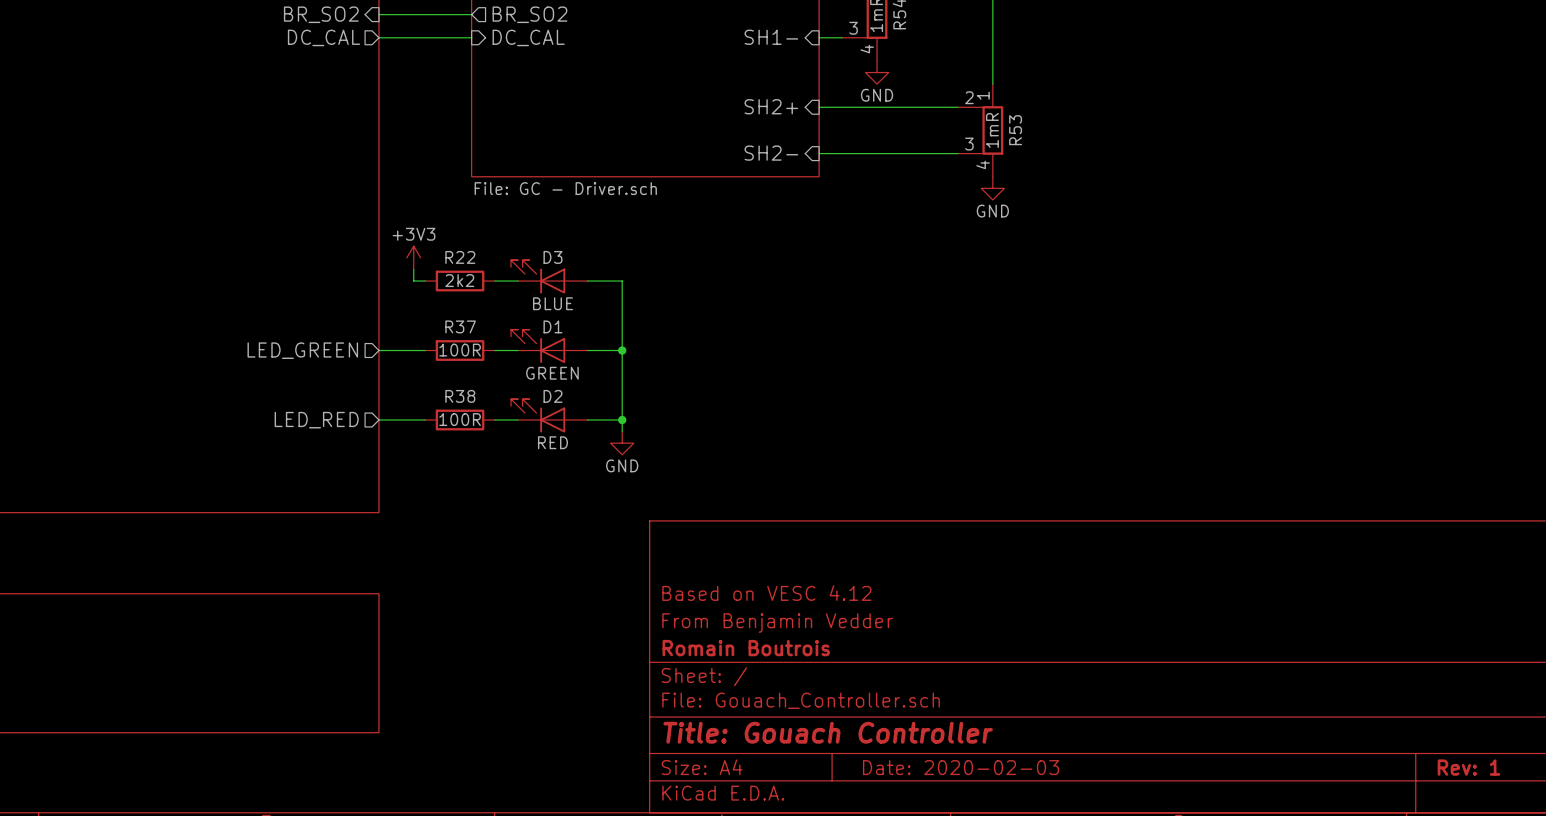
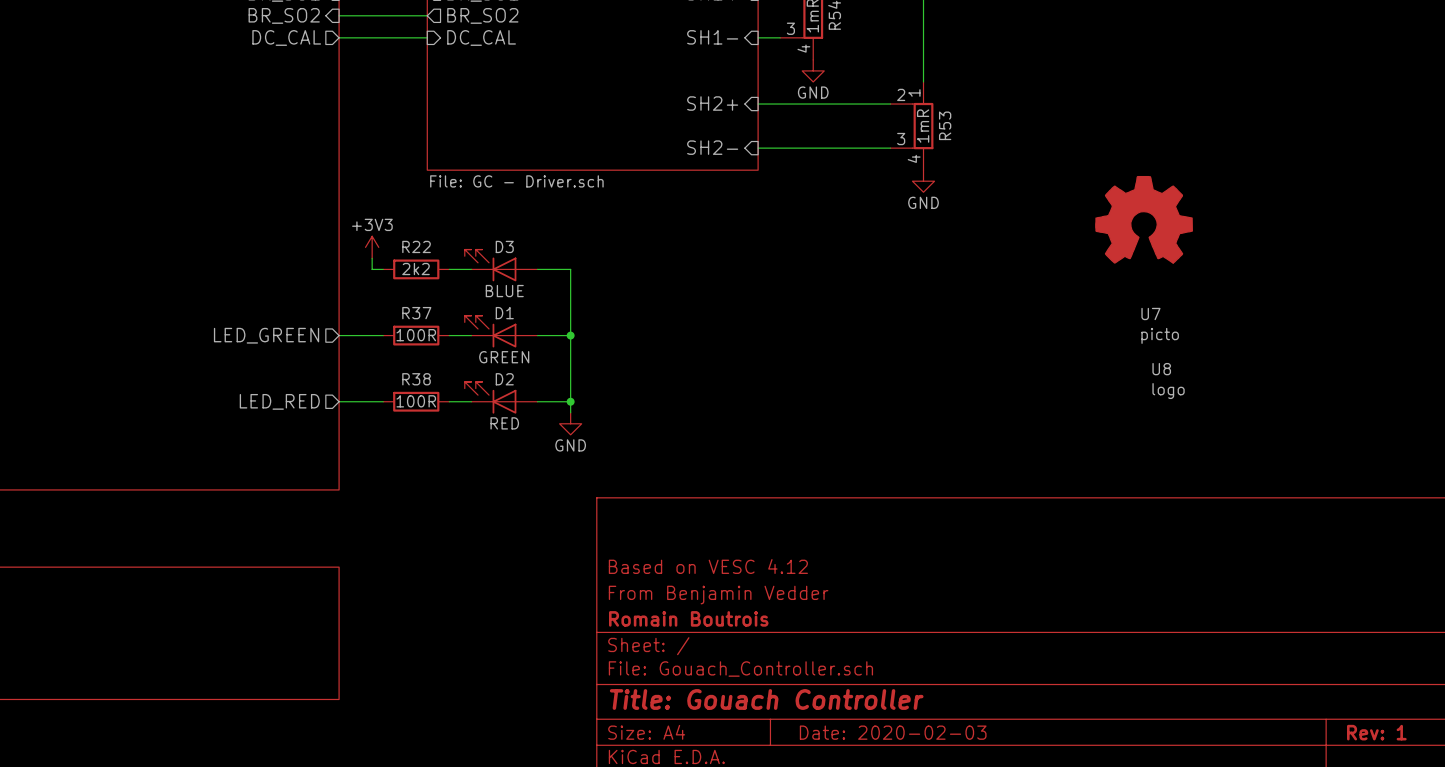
power symbol: none -> (1144, 219)
U7: none -> picto (1160, 325)
U8: none -> logo (1168, 381)

